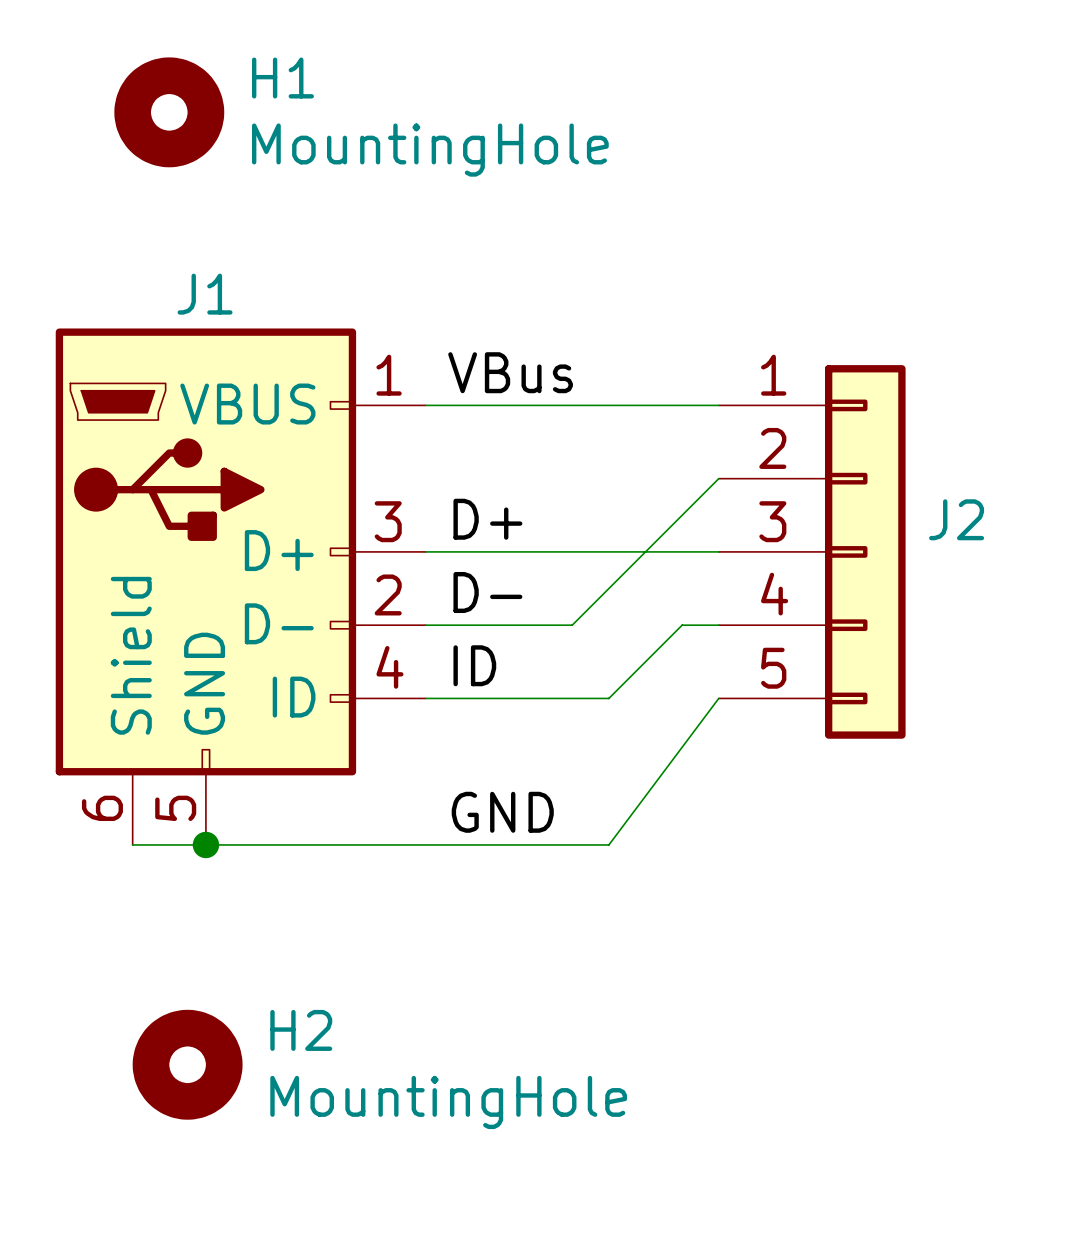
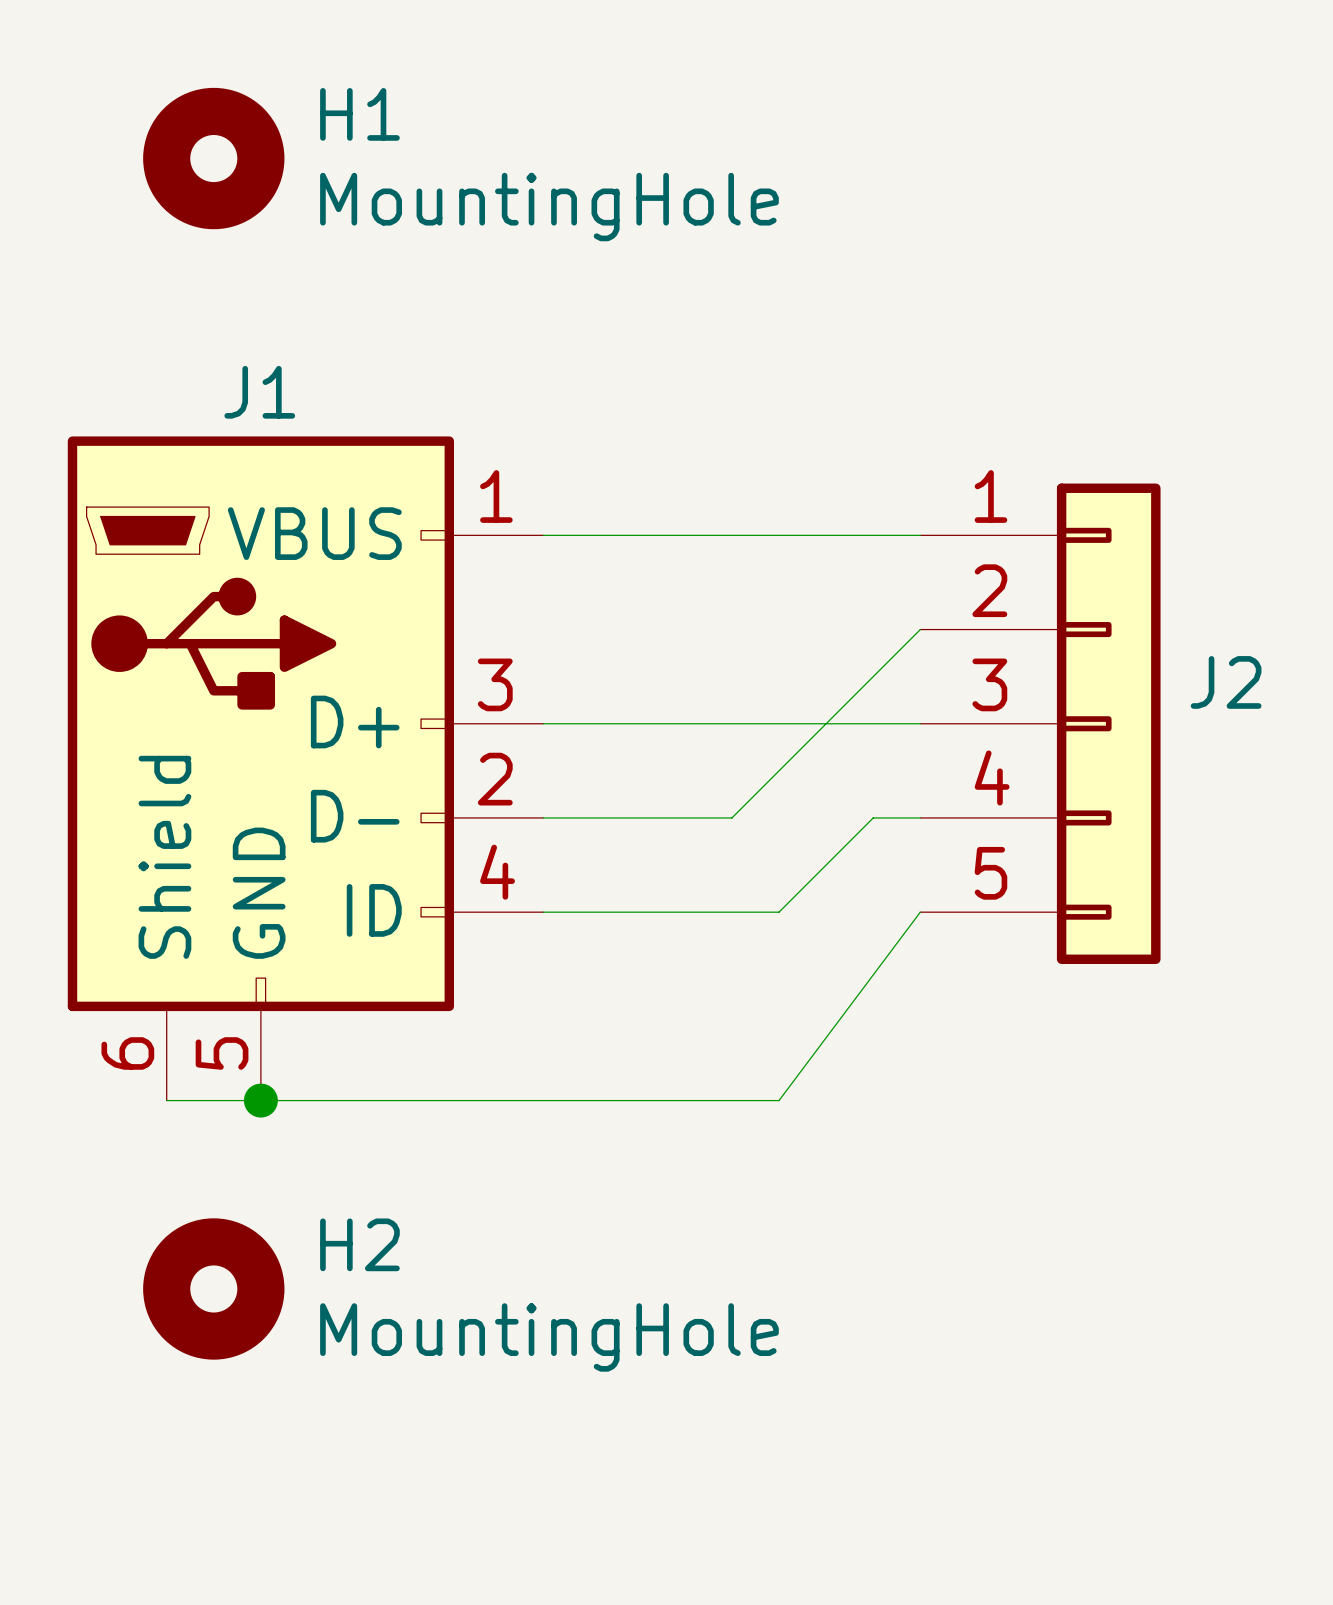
label: VBus (510, 372) -> none
label: D+ (487, 519) -> none
label: D- (487, 592) -> none
label: ID (474, 665) -> none
label: GND (502, 812) -> none
H2 position: (187, 1064) -> (213, 1288)

